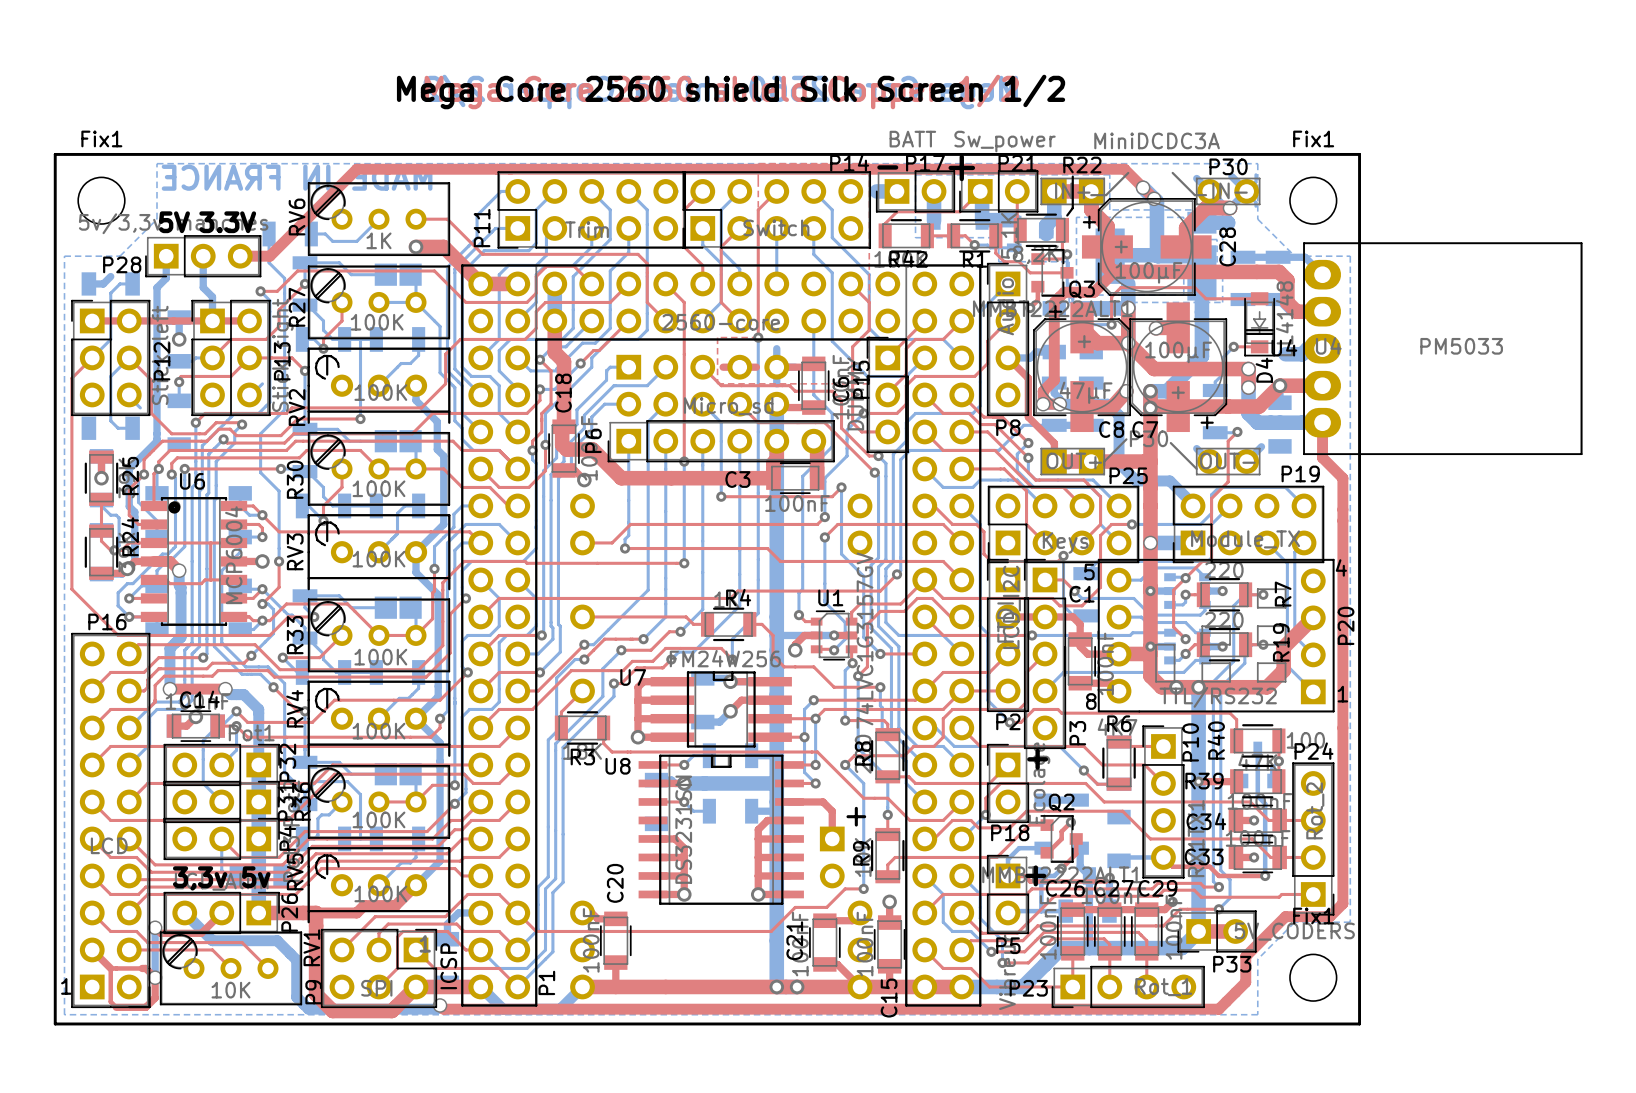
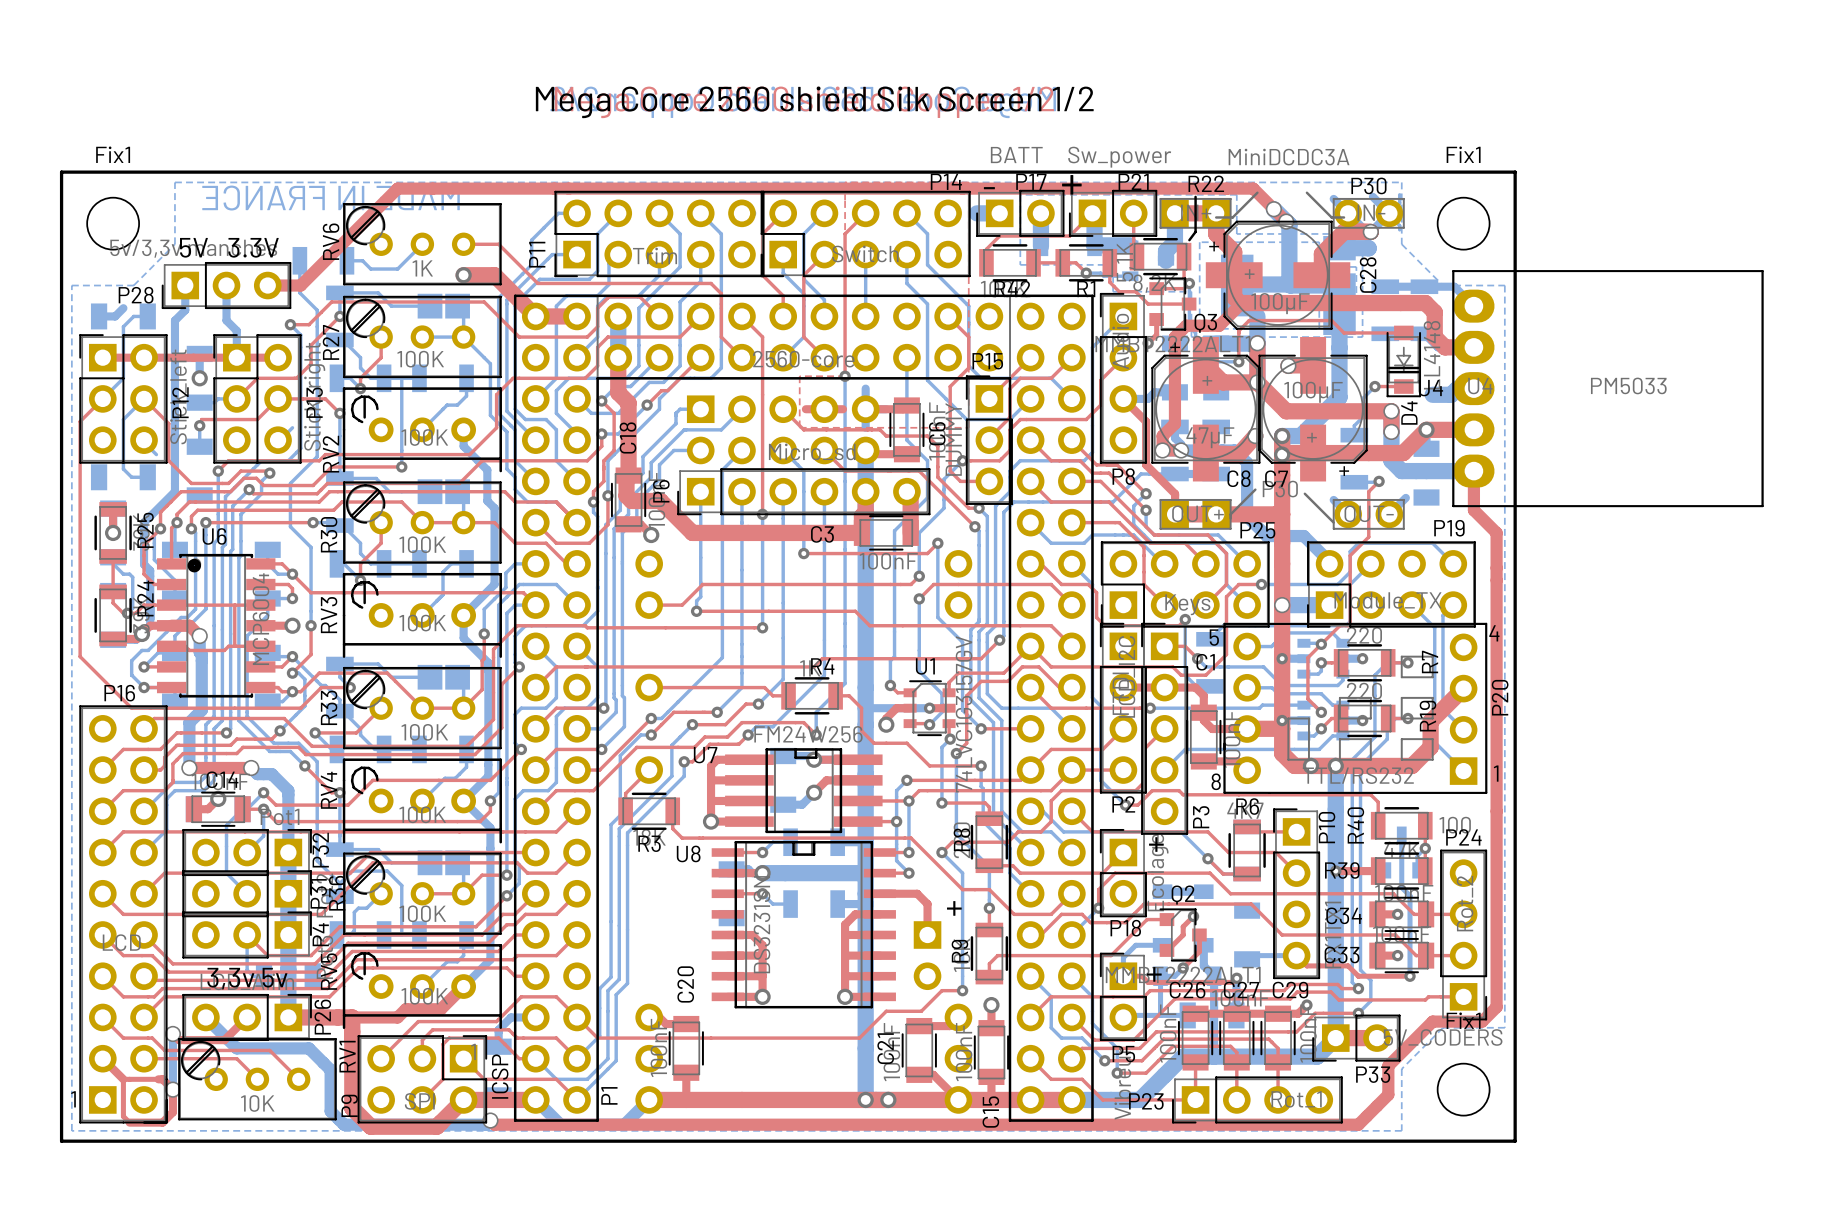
P15 name rotation: 0° (861, 379) -> 90° clockwise (987, 361)
P15 name position: P15 (861, 379) -> P15 (987, 361)

